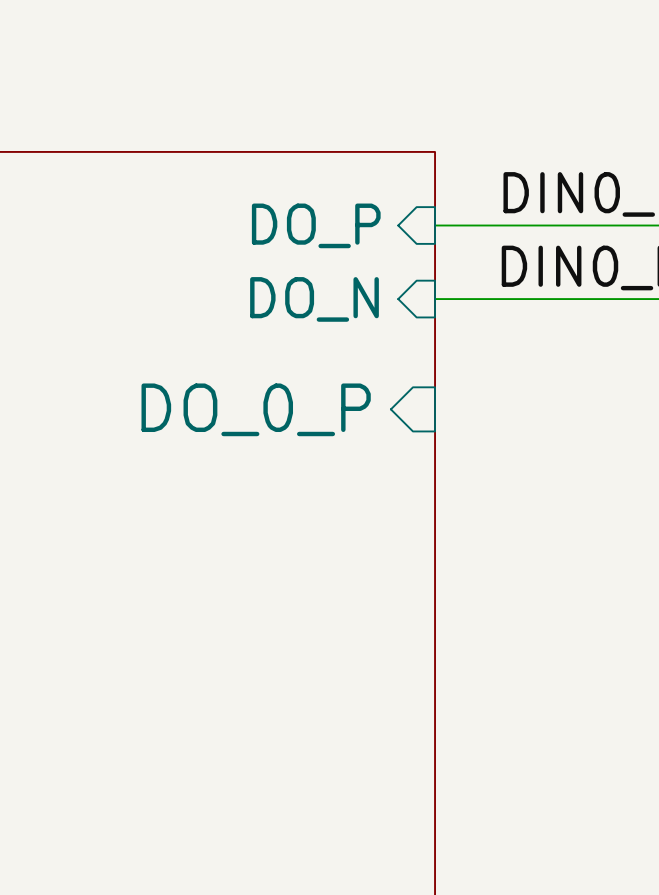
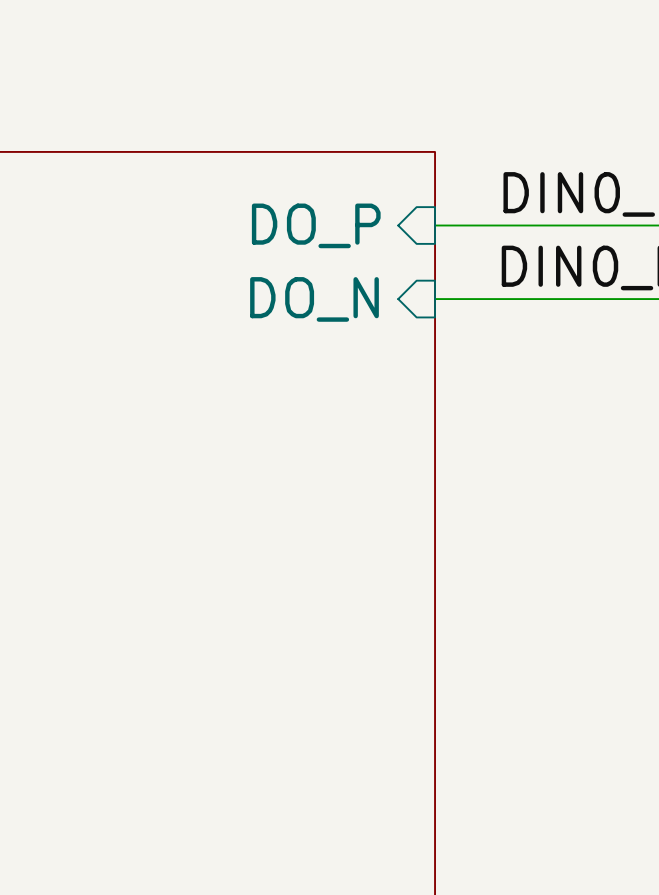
sheet pin: DO_0_P (256, 409) -> none

